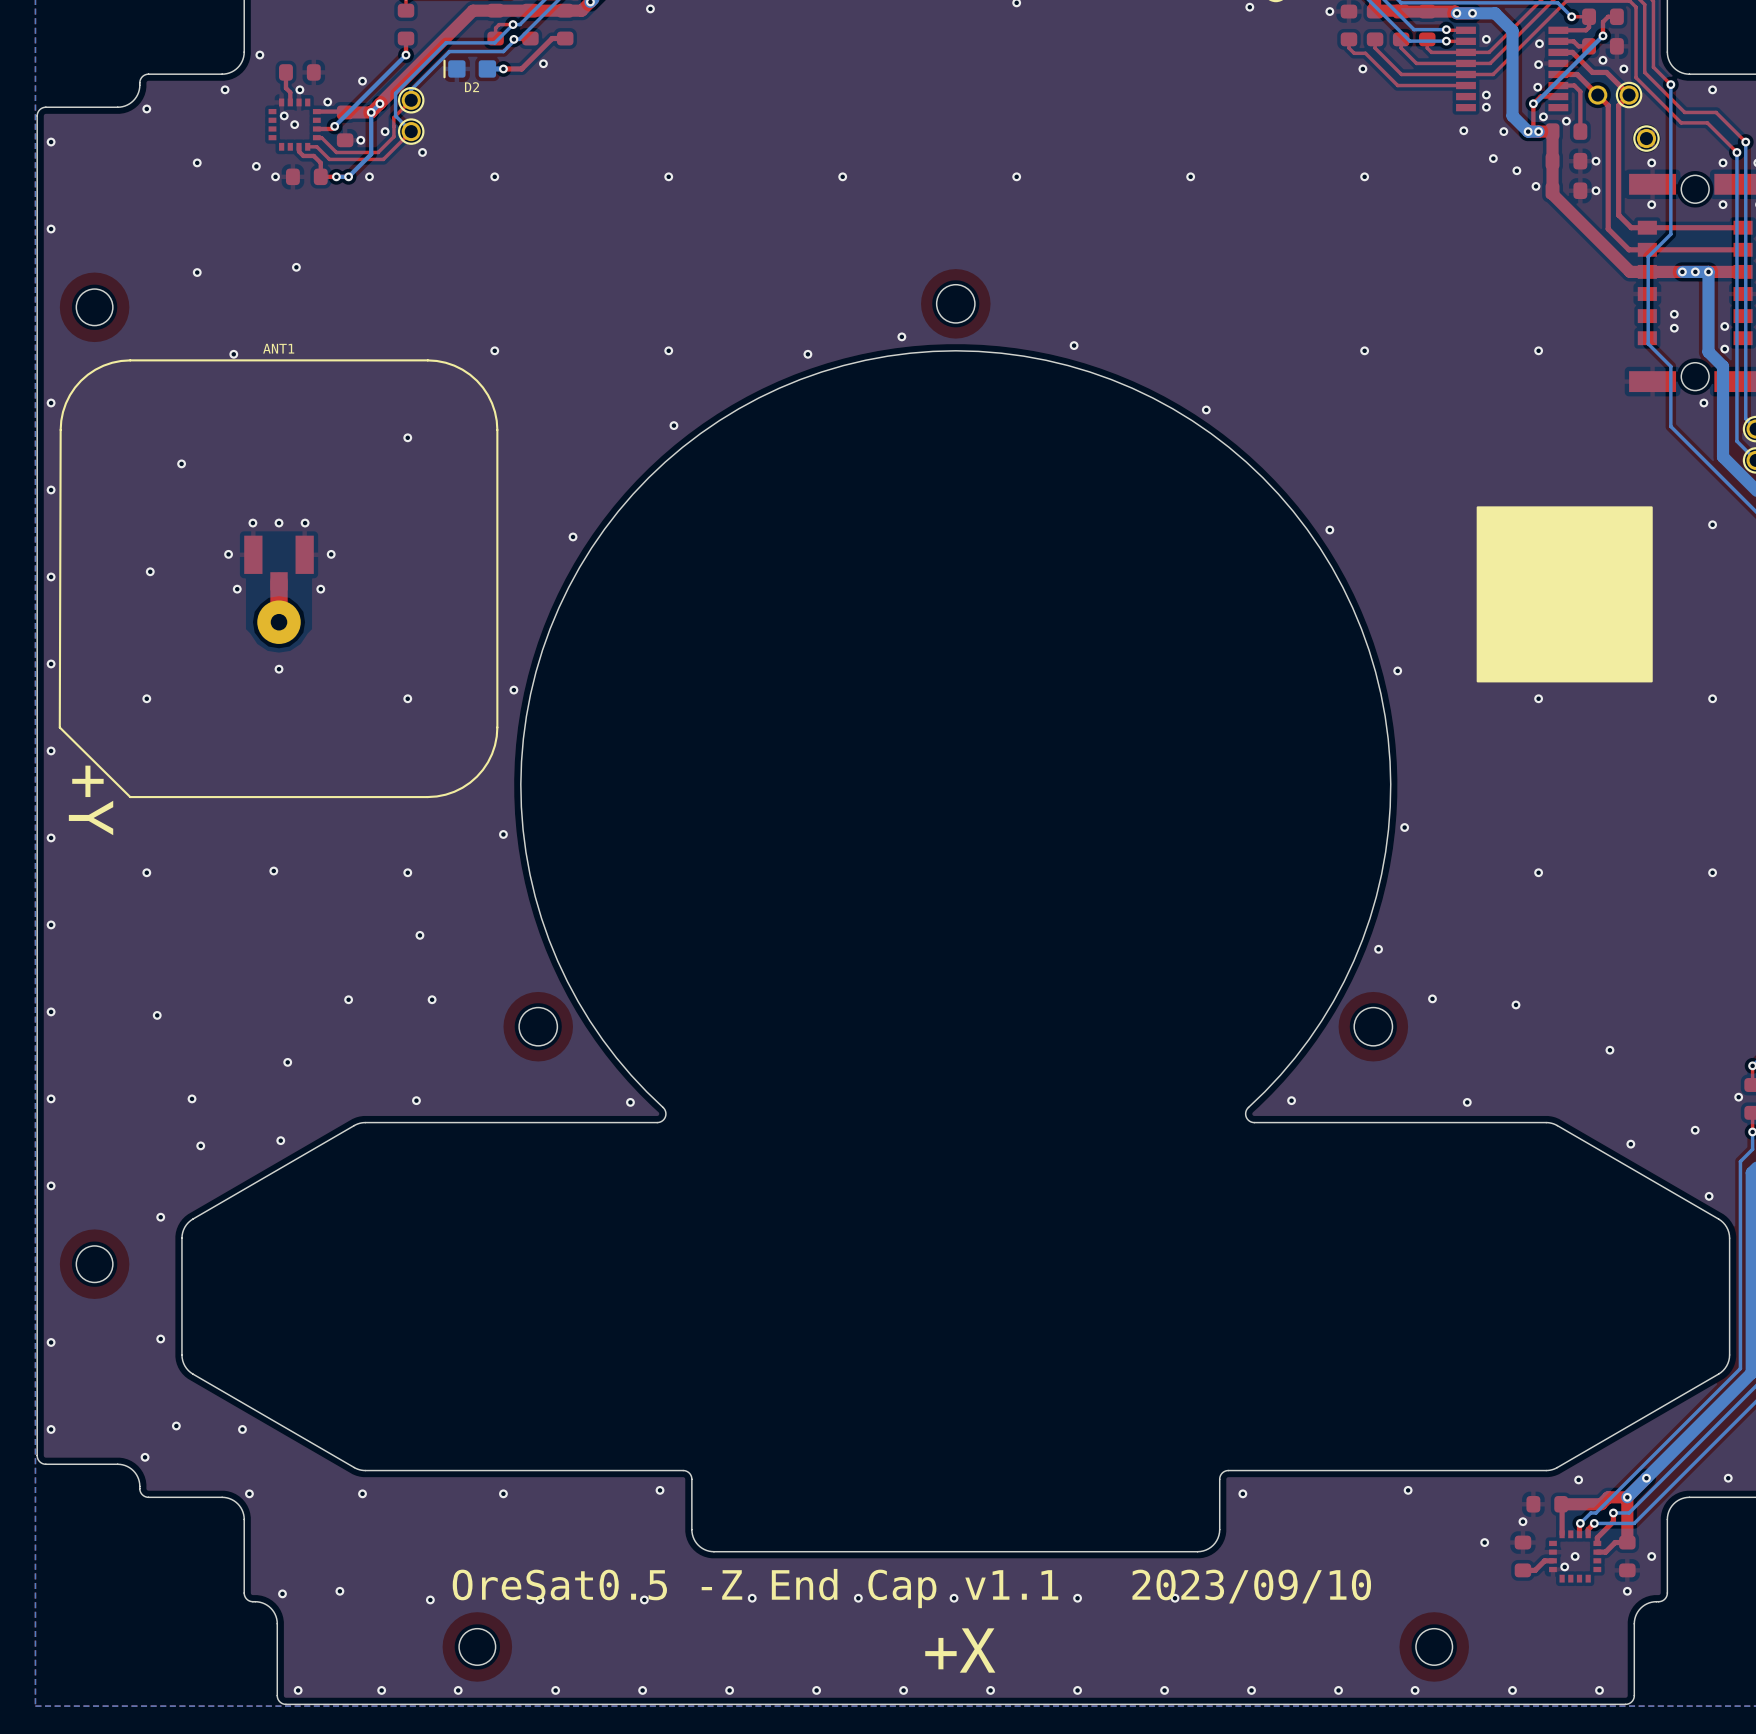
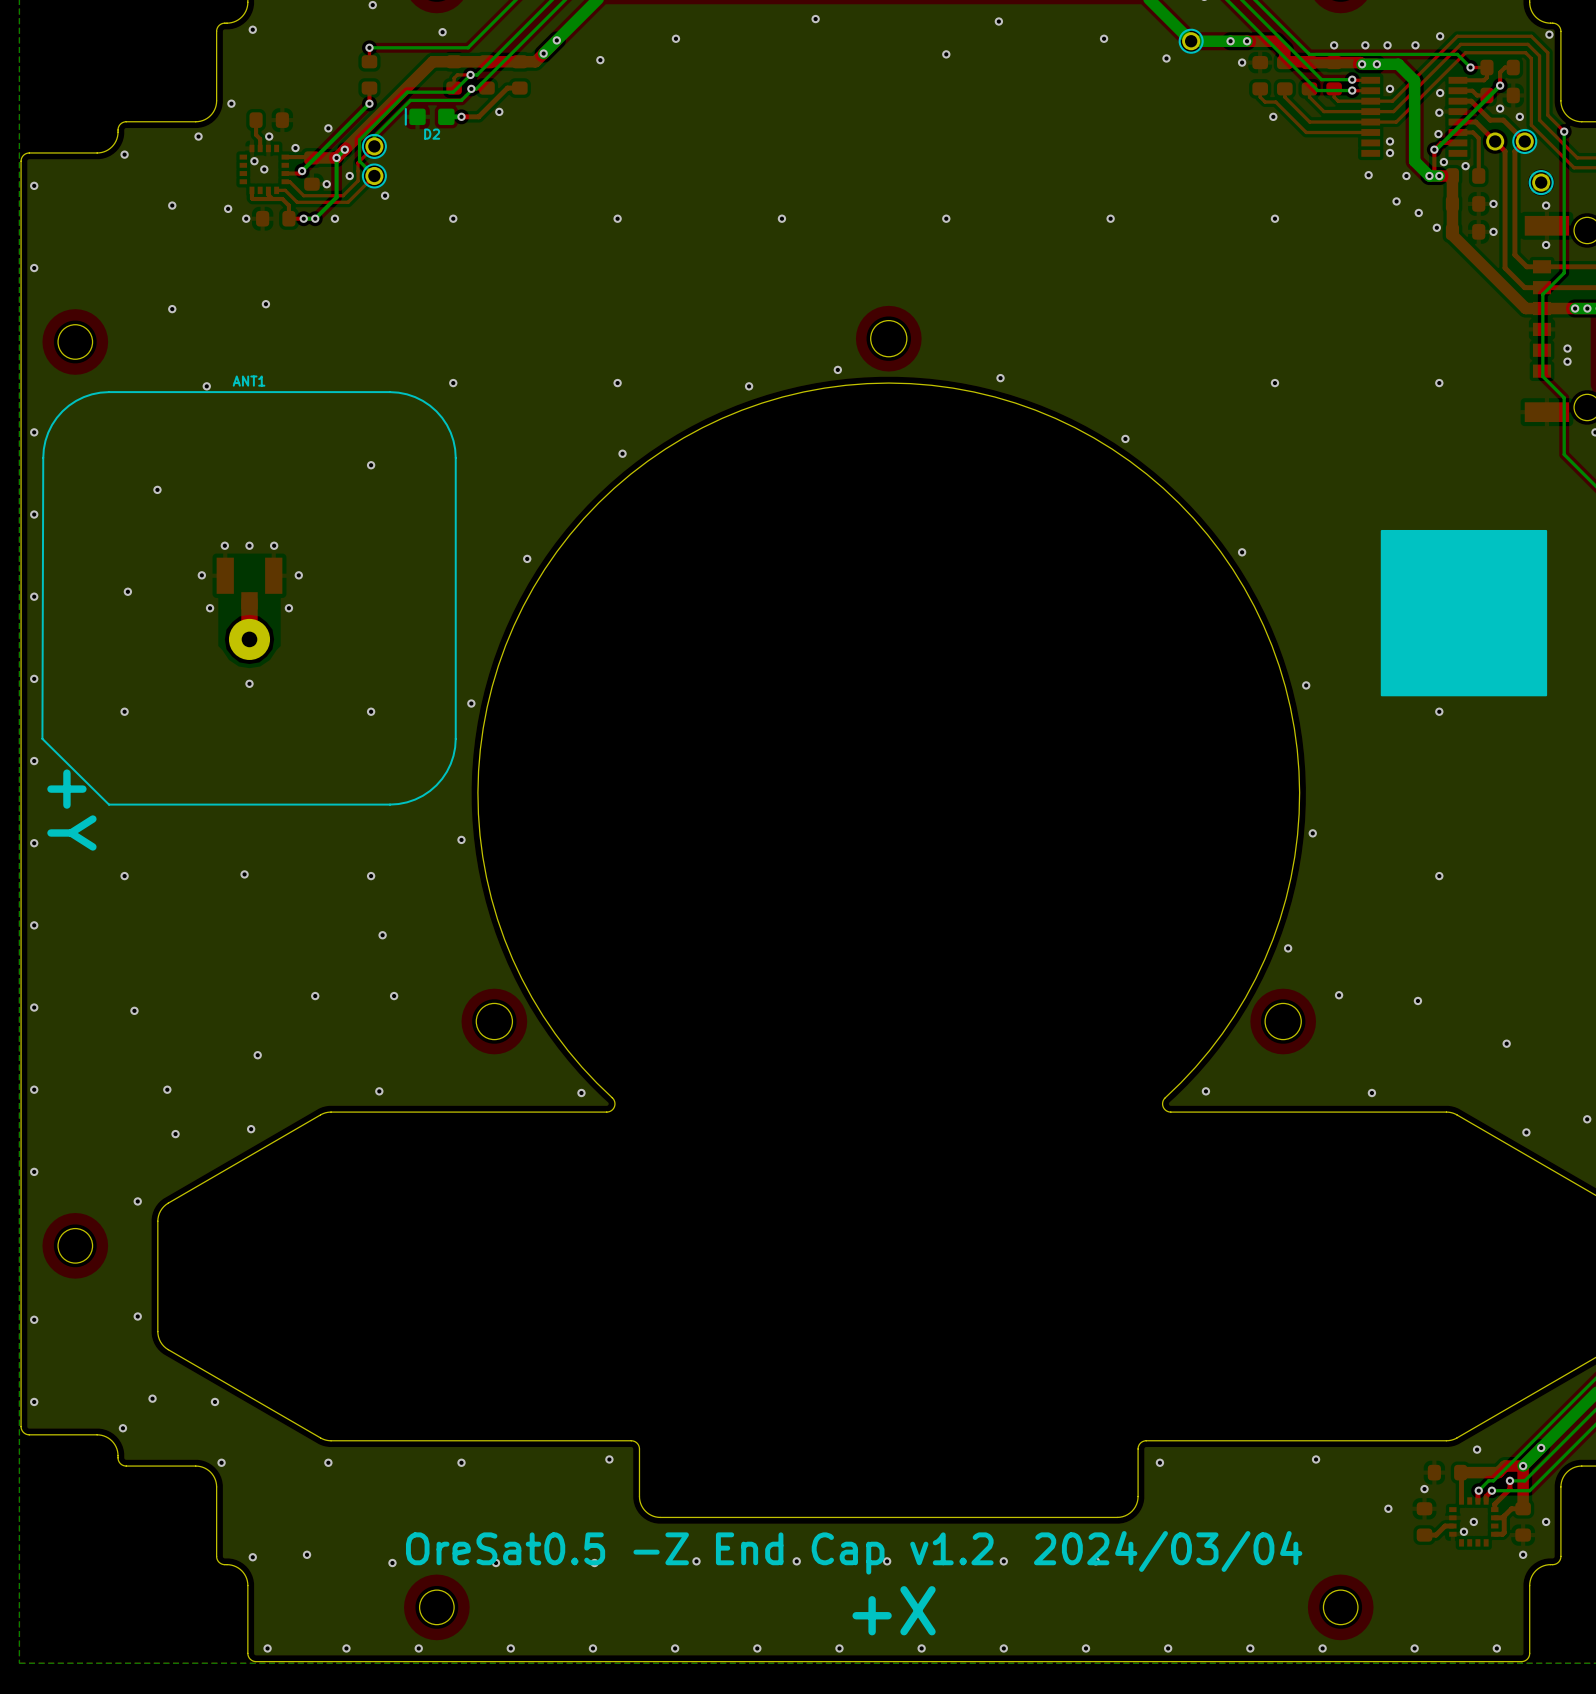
top track: none -> (251, 190) (252, 199) (272, 199)
top track: none -> (1504, 1516) (1504, 1532) (1494, 1534)
text: 2023/09/10 (1251, 1586) -> 2024/03/04 (1168, 1551)
text: OreSat0.5 -Z End Cap v1.1 (755, 1588) -> OreSat0.5 -Z End Cap v1.2 (699, 1553)

